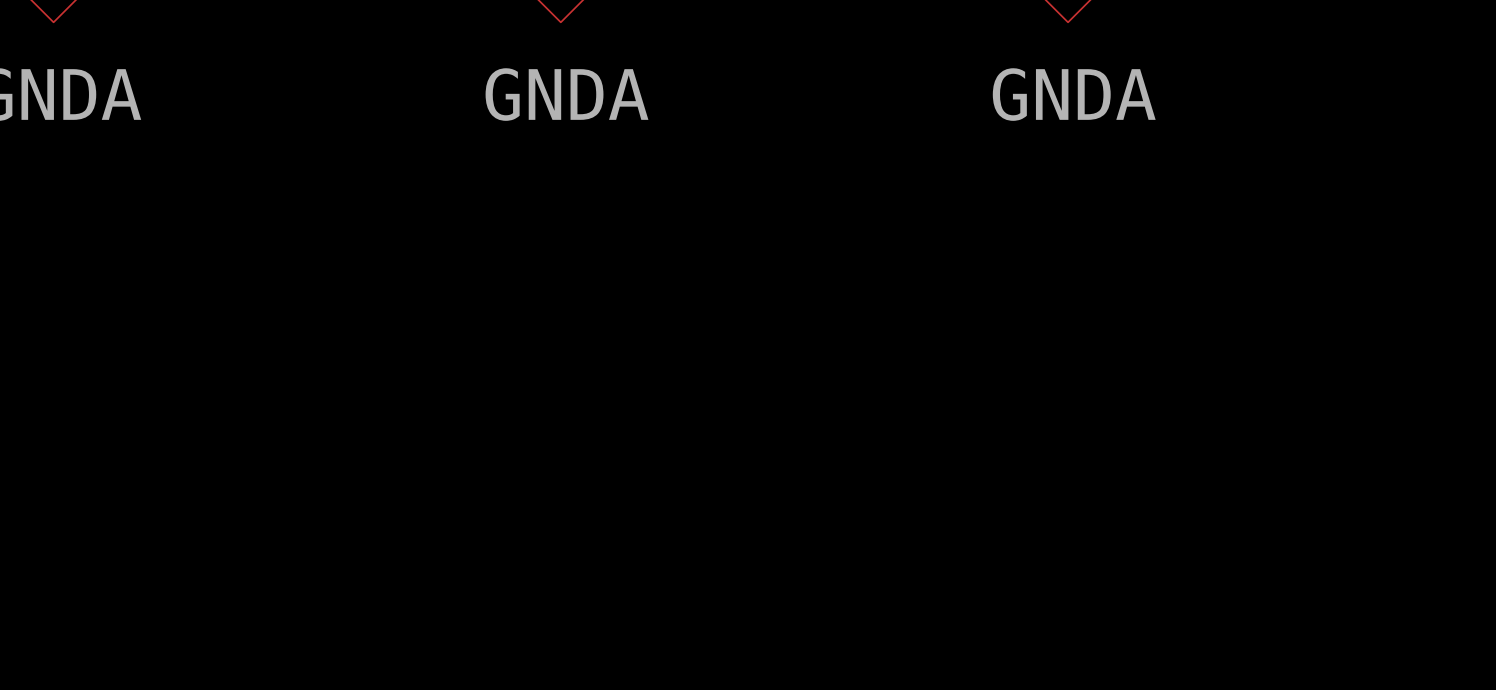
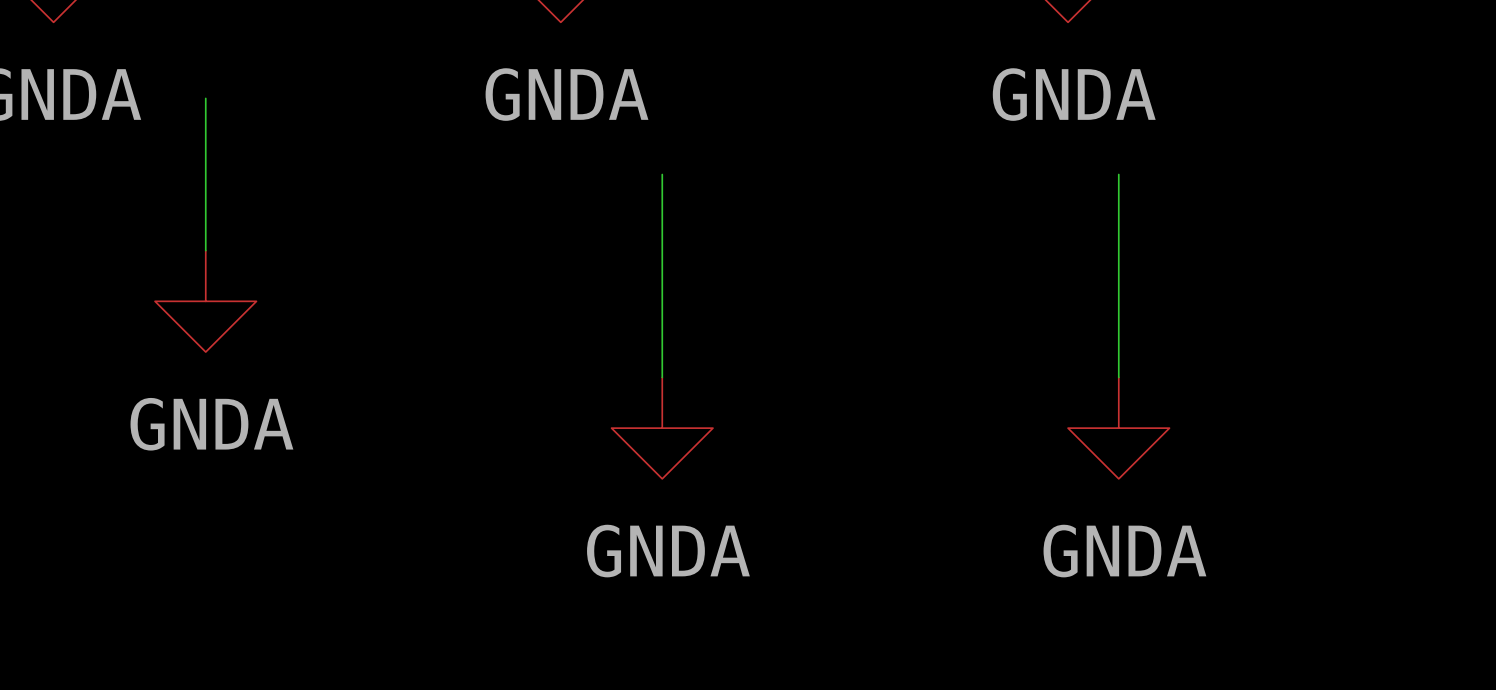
wire: none -> (205, 98) (205, 250)
wire: none -> (662, 174) (662, 377)
wire: none -> (1118, 174) (1118, 377)
power symbol: none -> GNDA (205, 301)
power symbol: none -> GNDA (662, 428)
power symbol: none -> GNDA (1118, 428)

